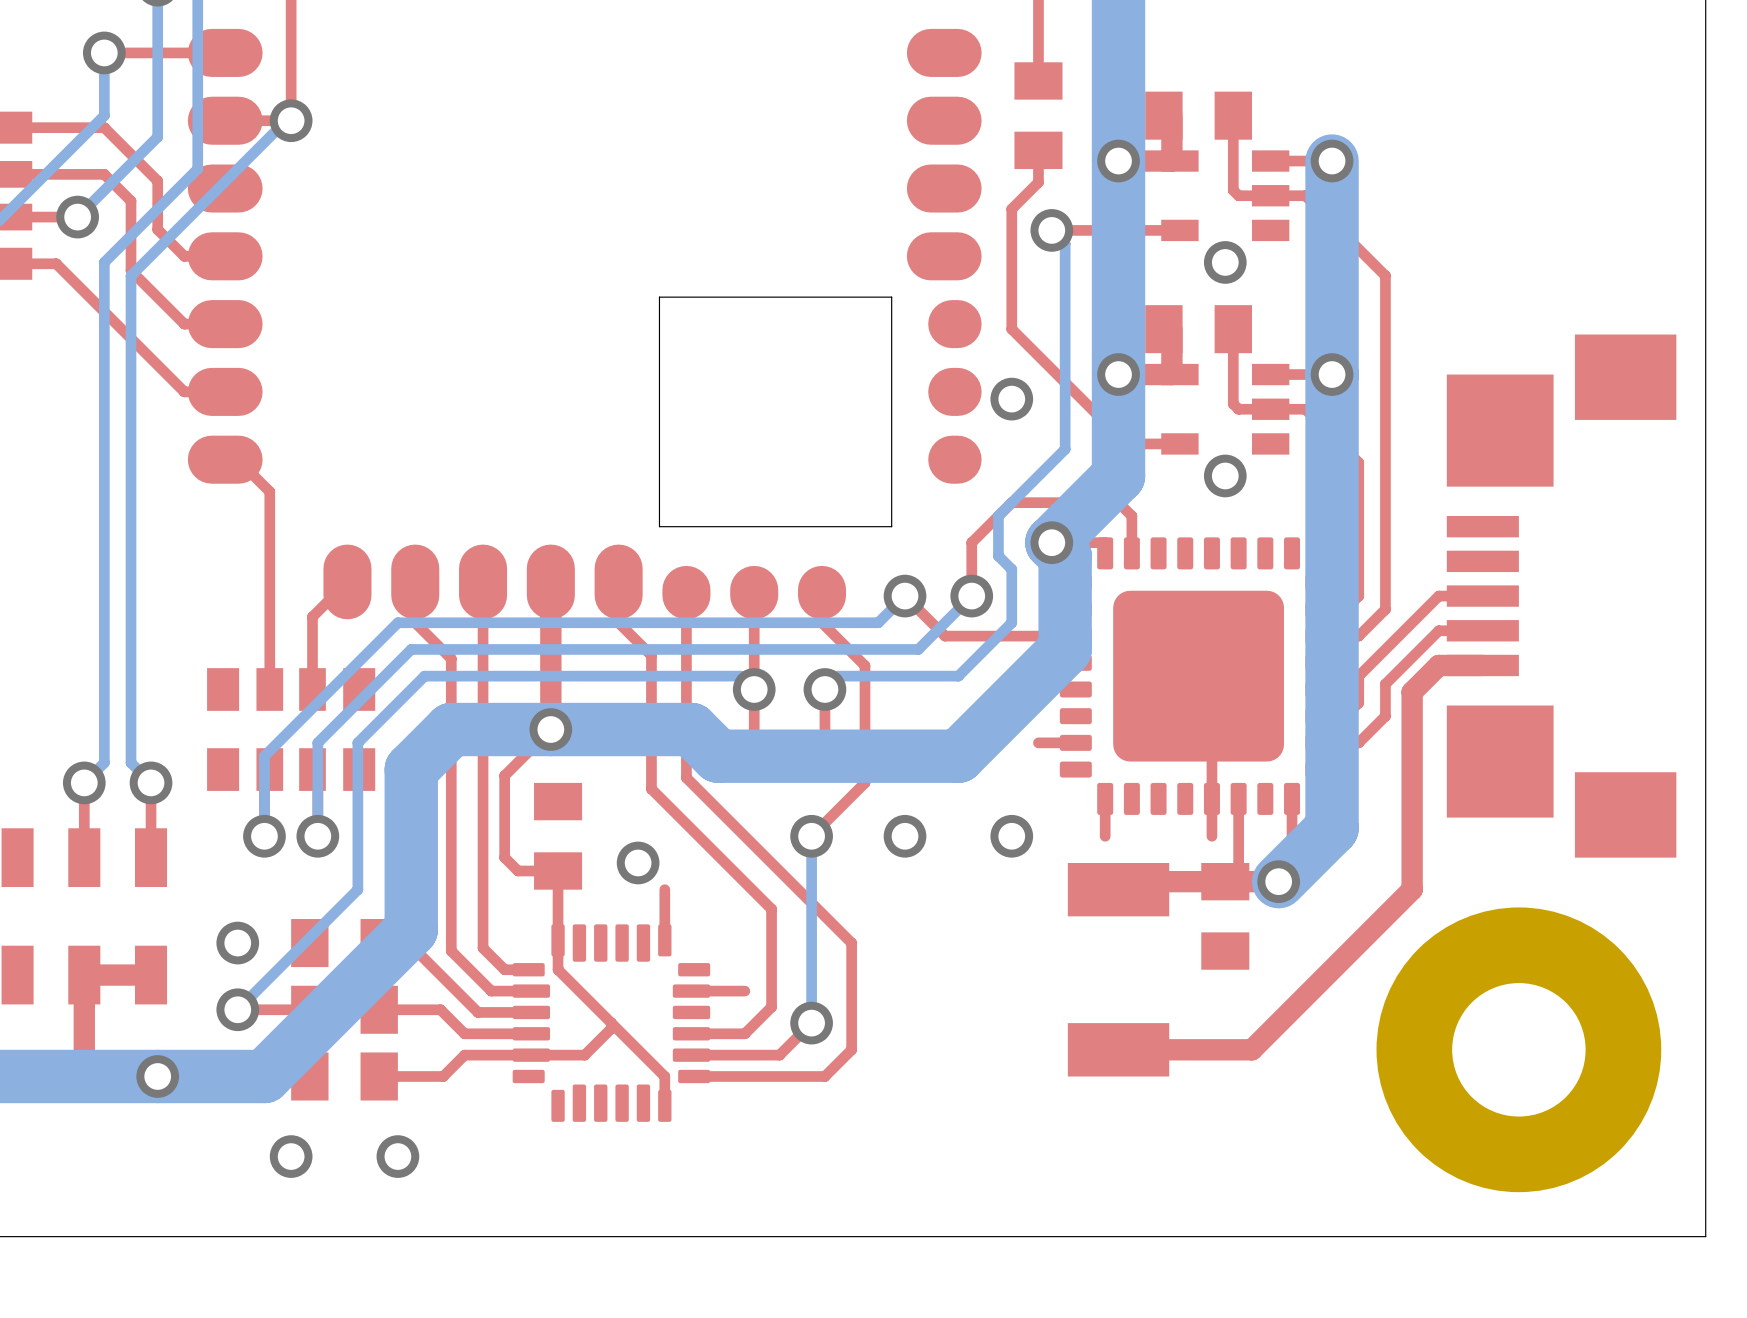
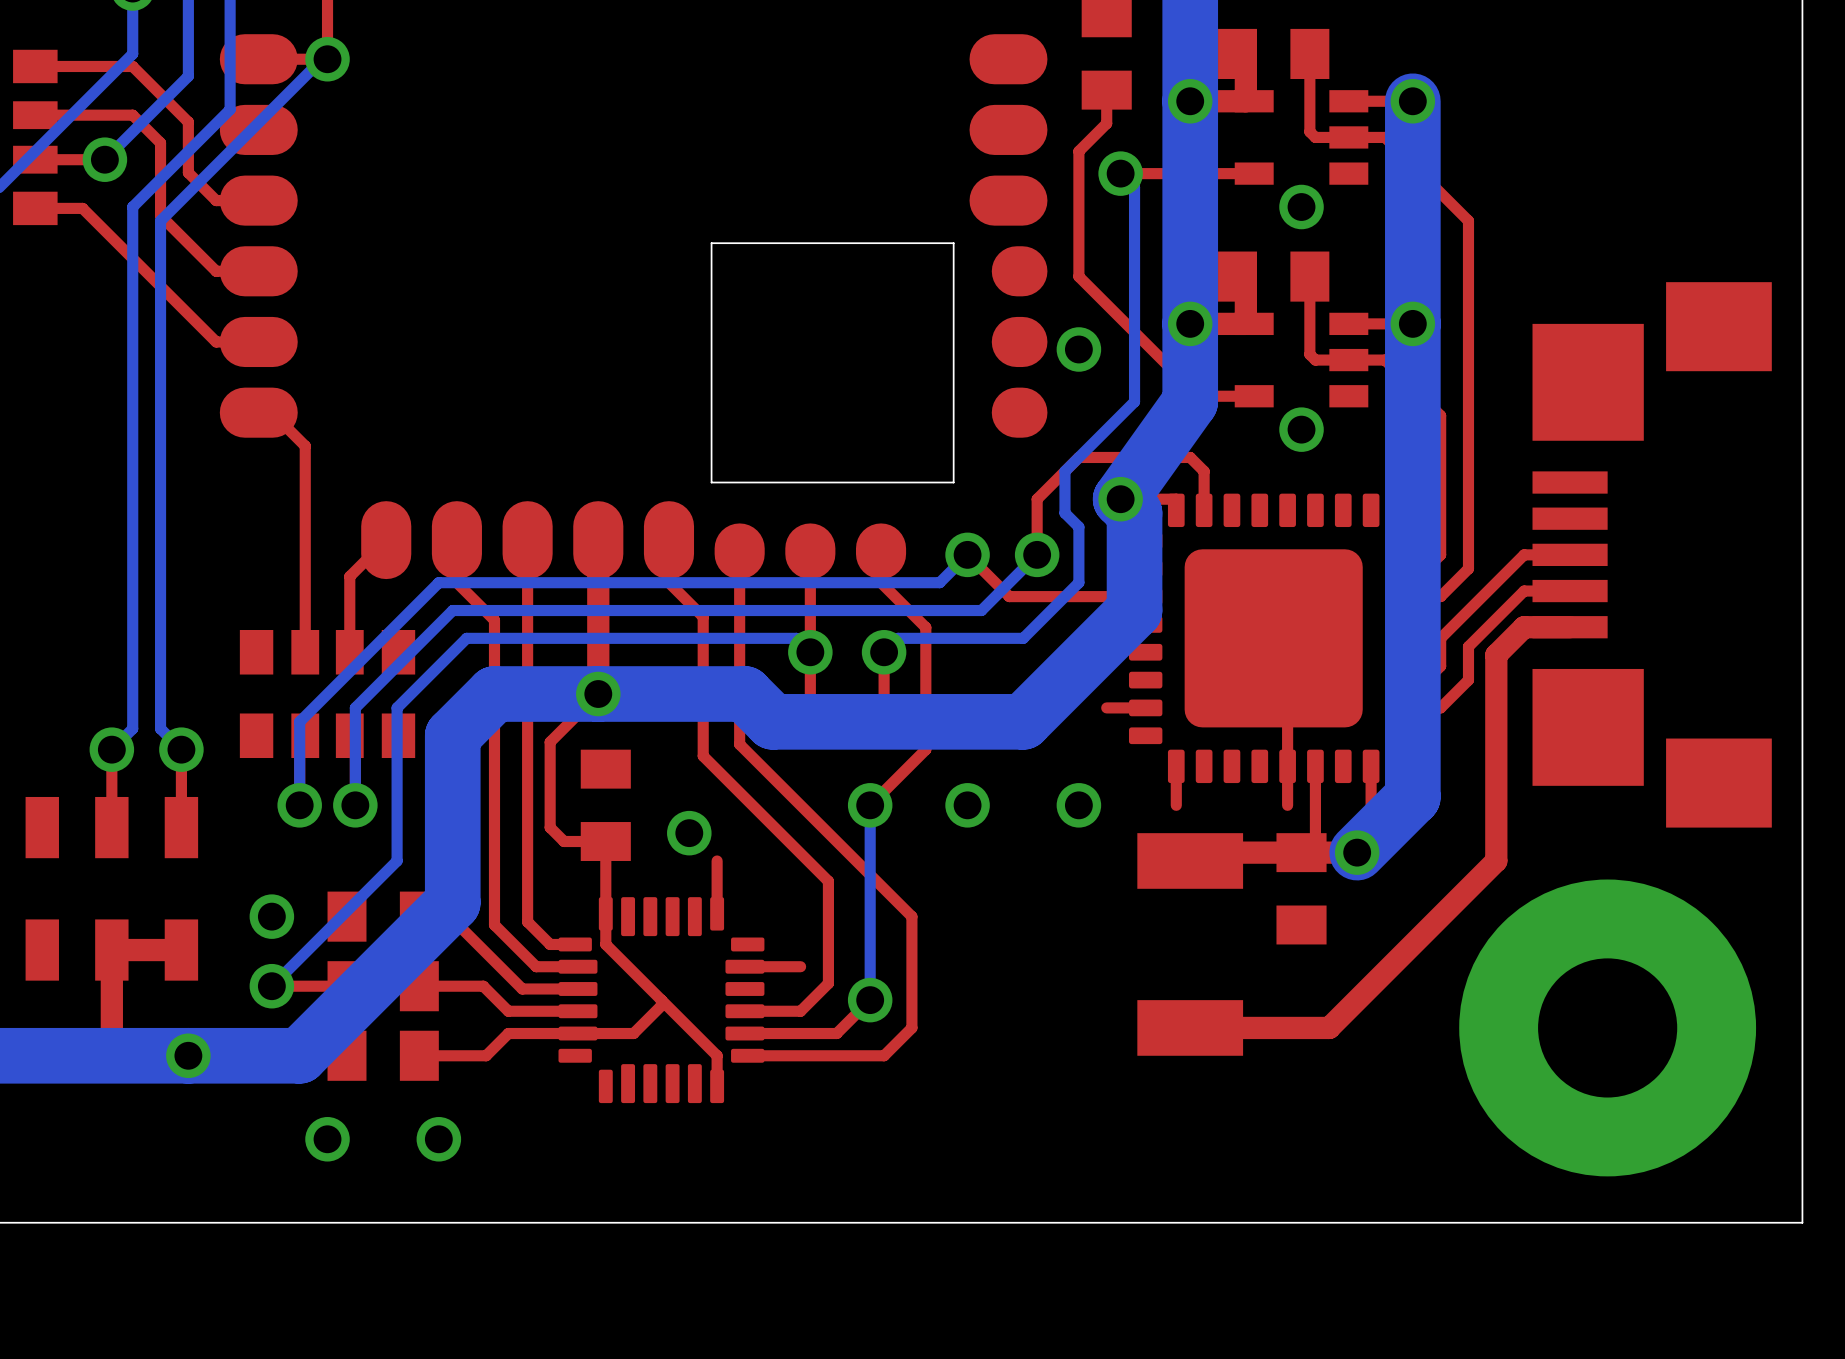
bottom track: (1118, 449) (1118, 475) (1051, 542) -> (1190, 401) (1120, 499)

